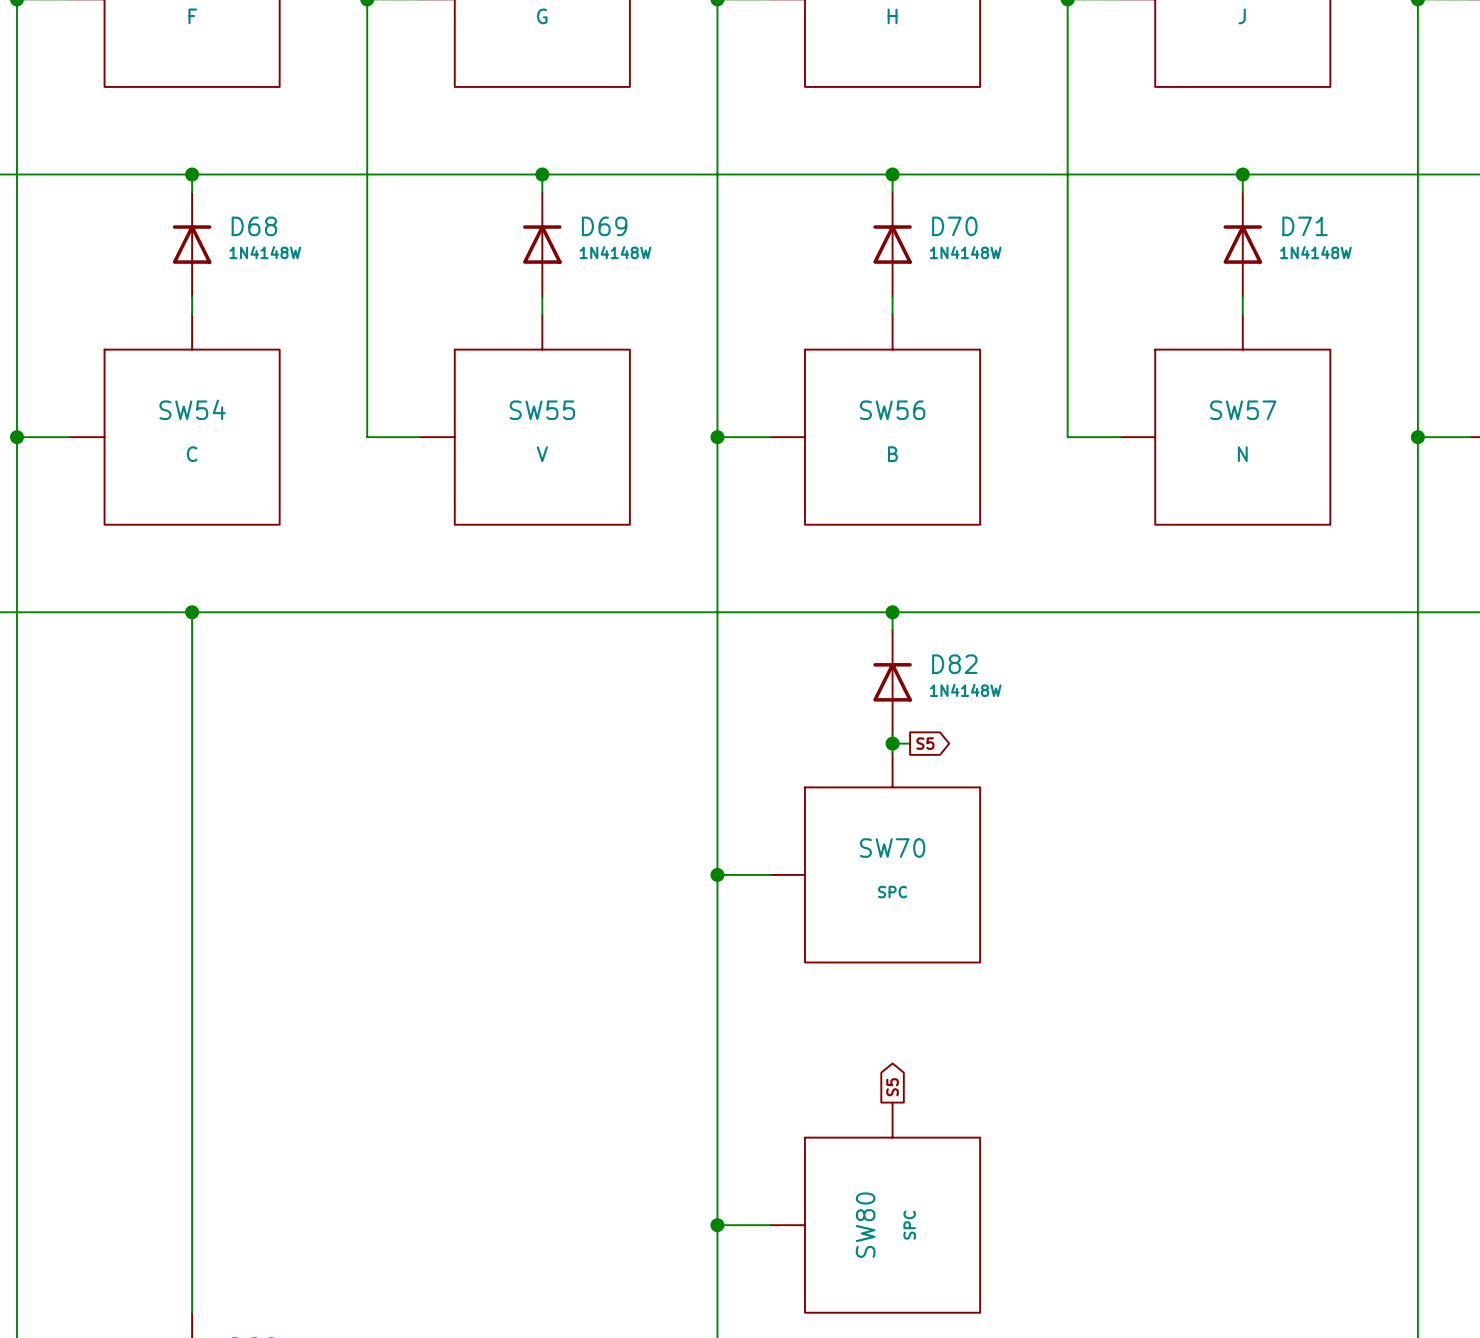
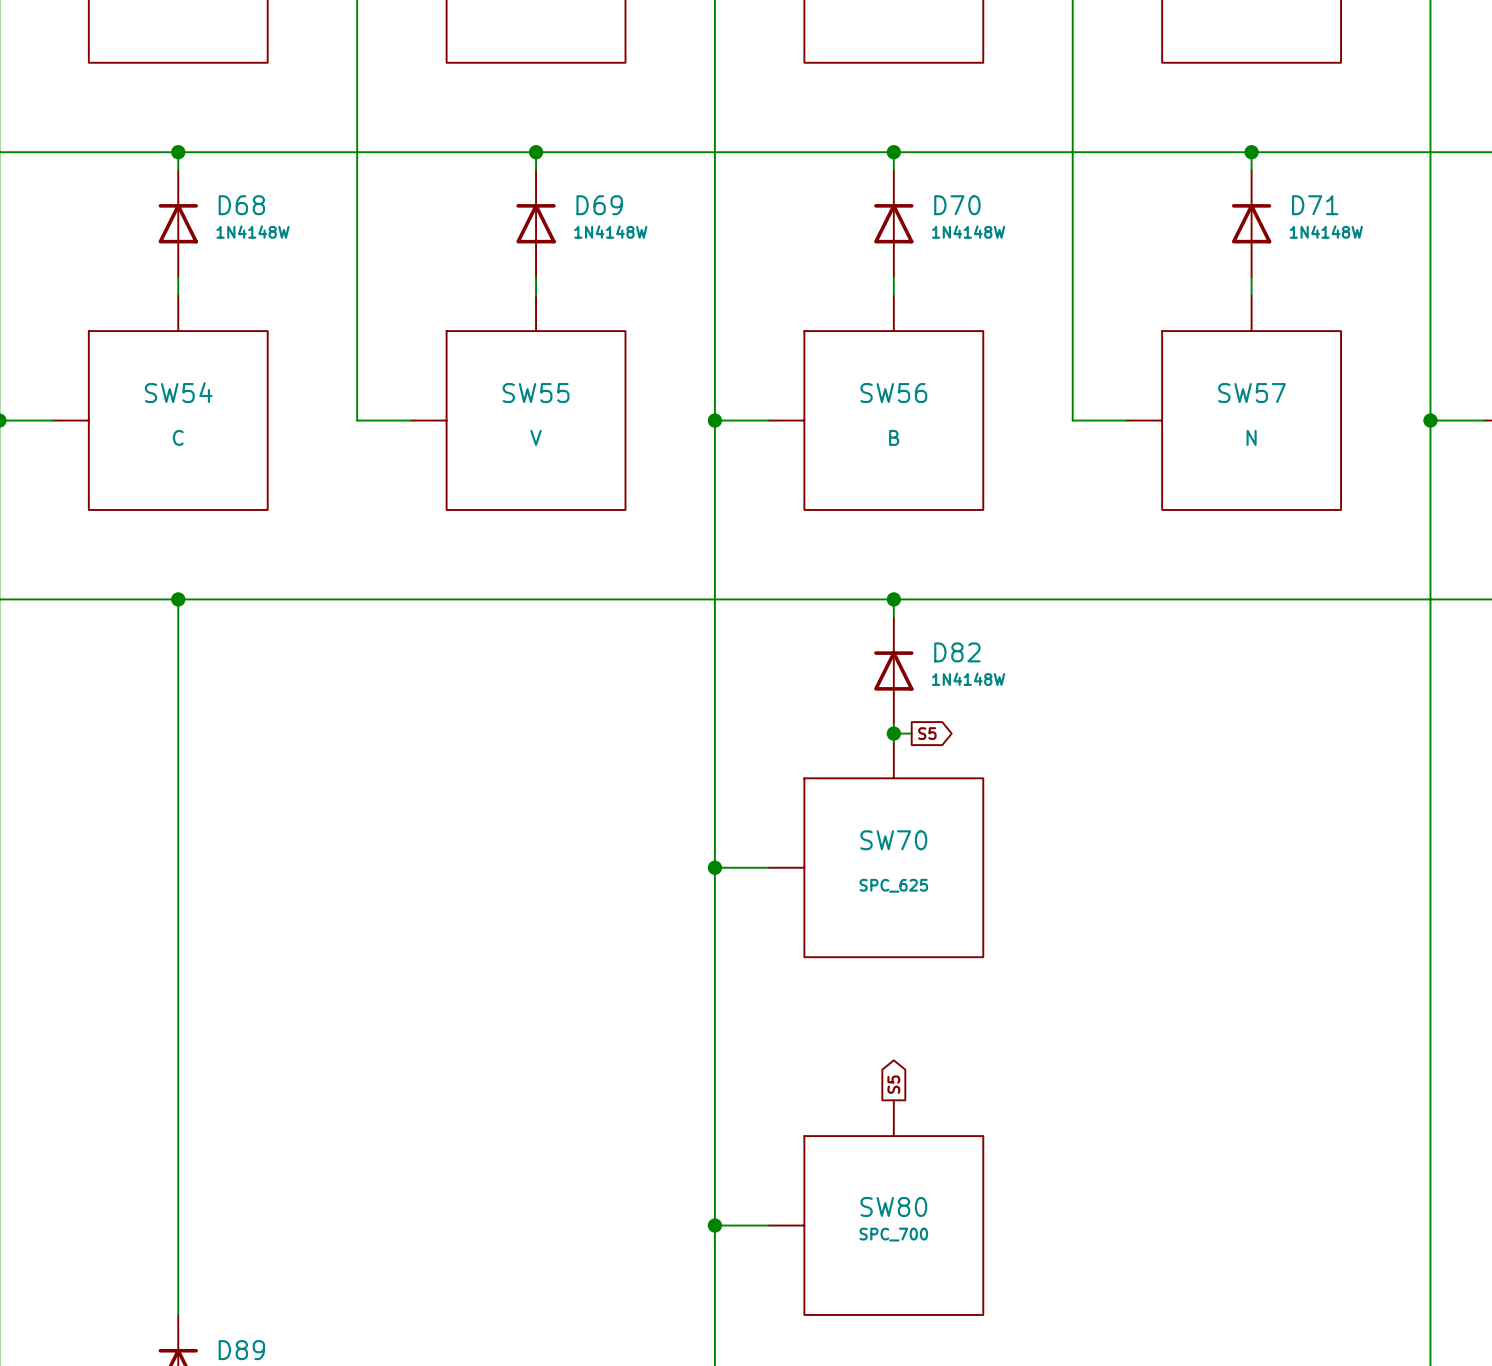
SW70 value: SPC (892, 892) -> SPC_625 (893, 885)
SW80 name rotation: 0° (865, 1225) -> 90° clockwise (893, 1206)
SW80 value: SPC (909, 1225) -> SPC_700 (893, 1234)

